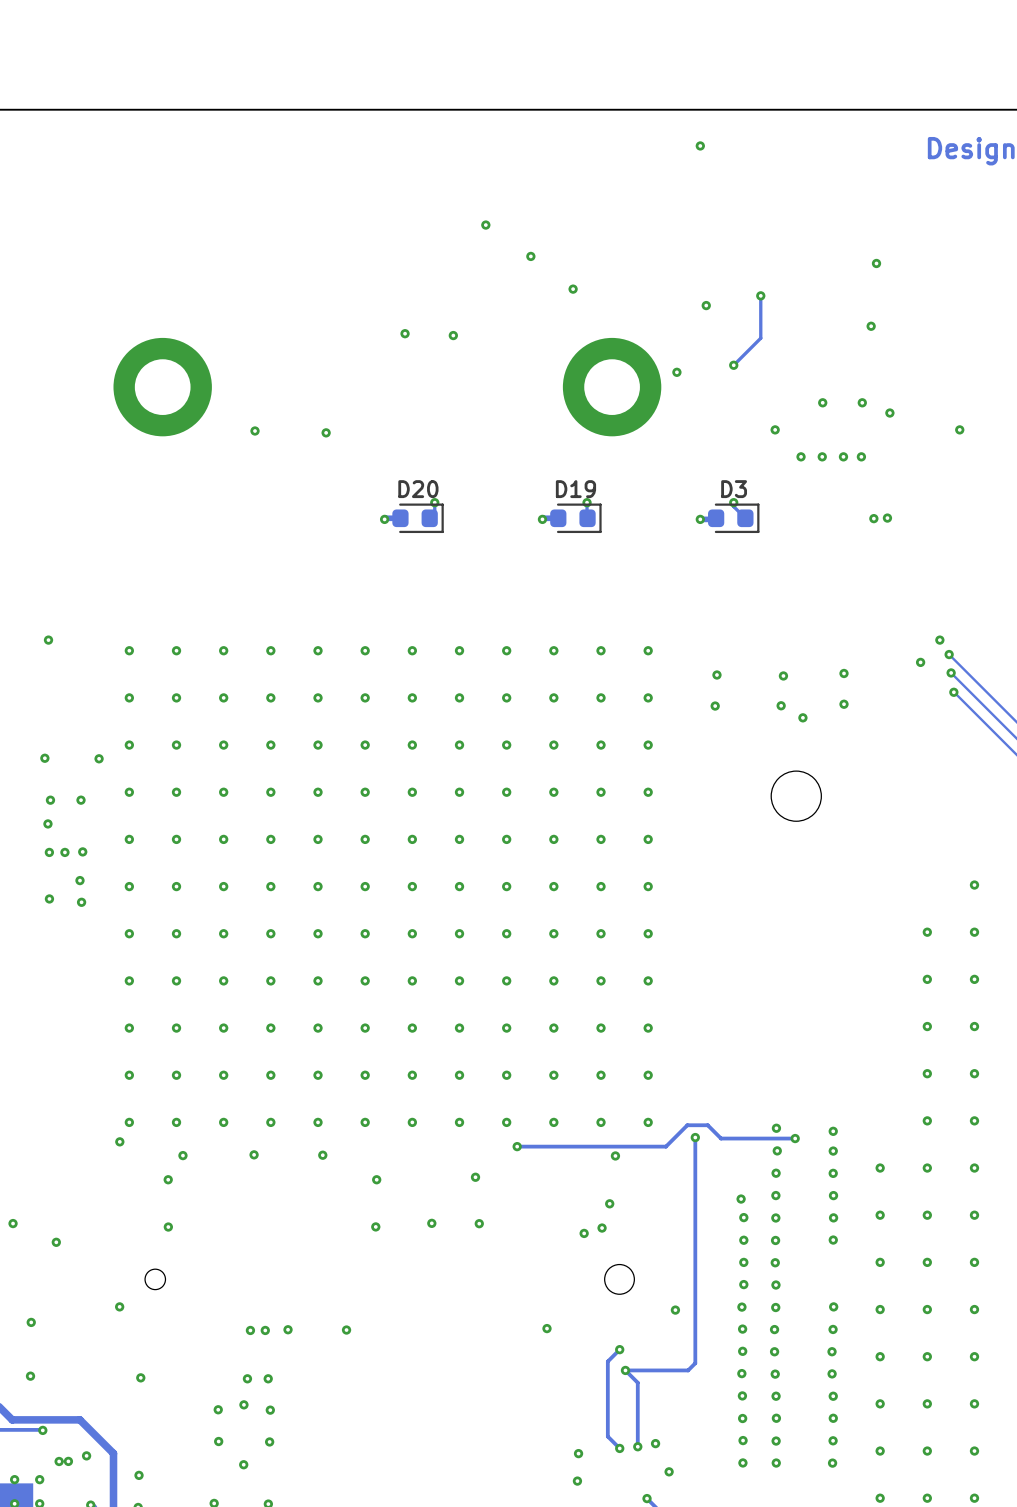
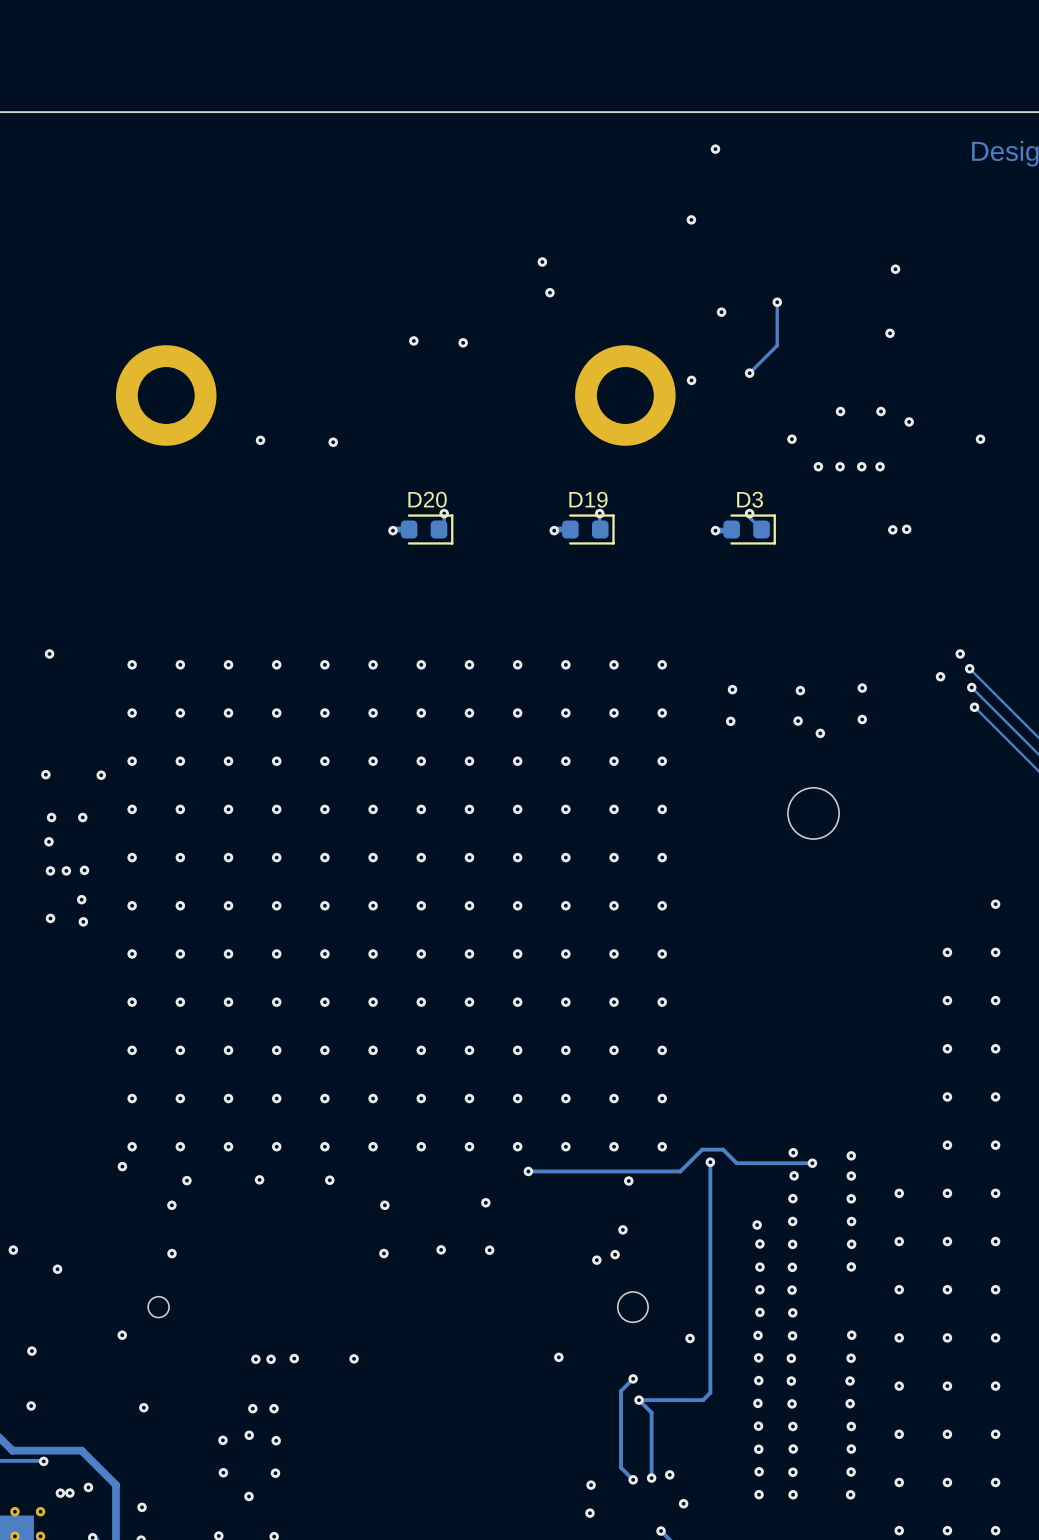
via: none -> (691, 219)
via: (485, 225) -> none
via position: (573, 289) -> (549, 292)

